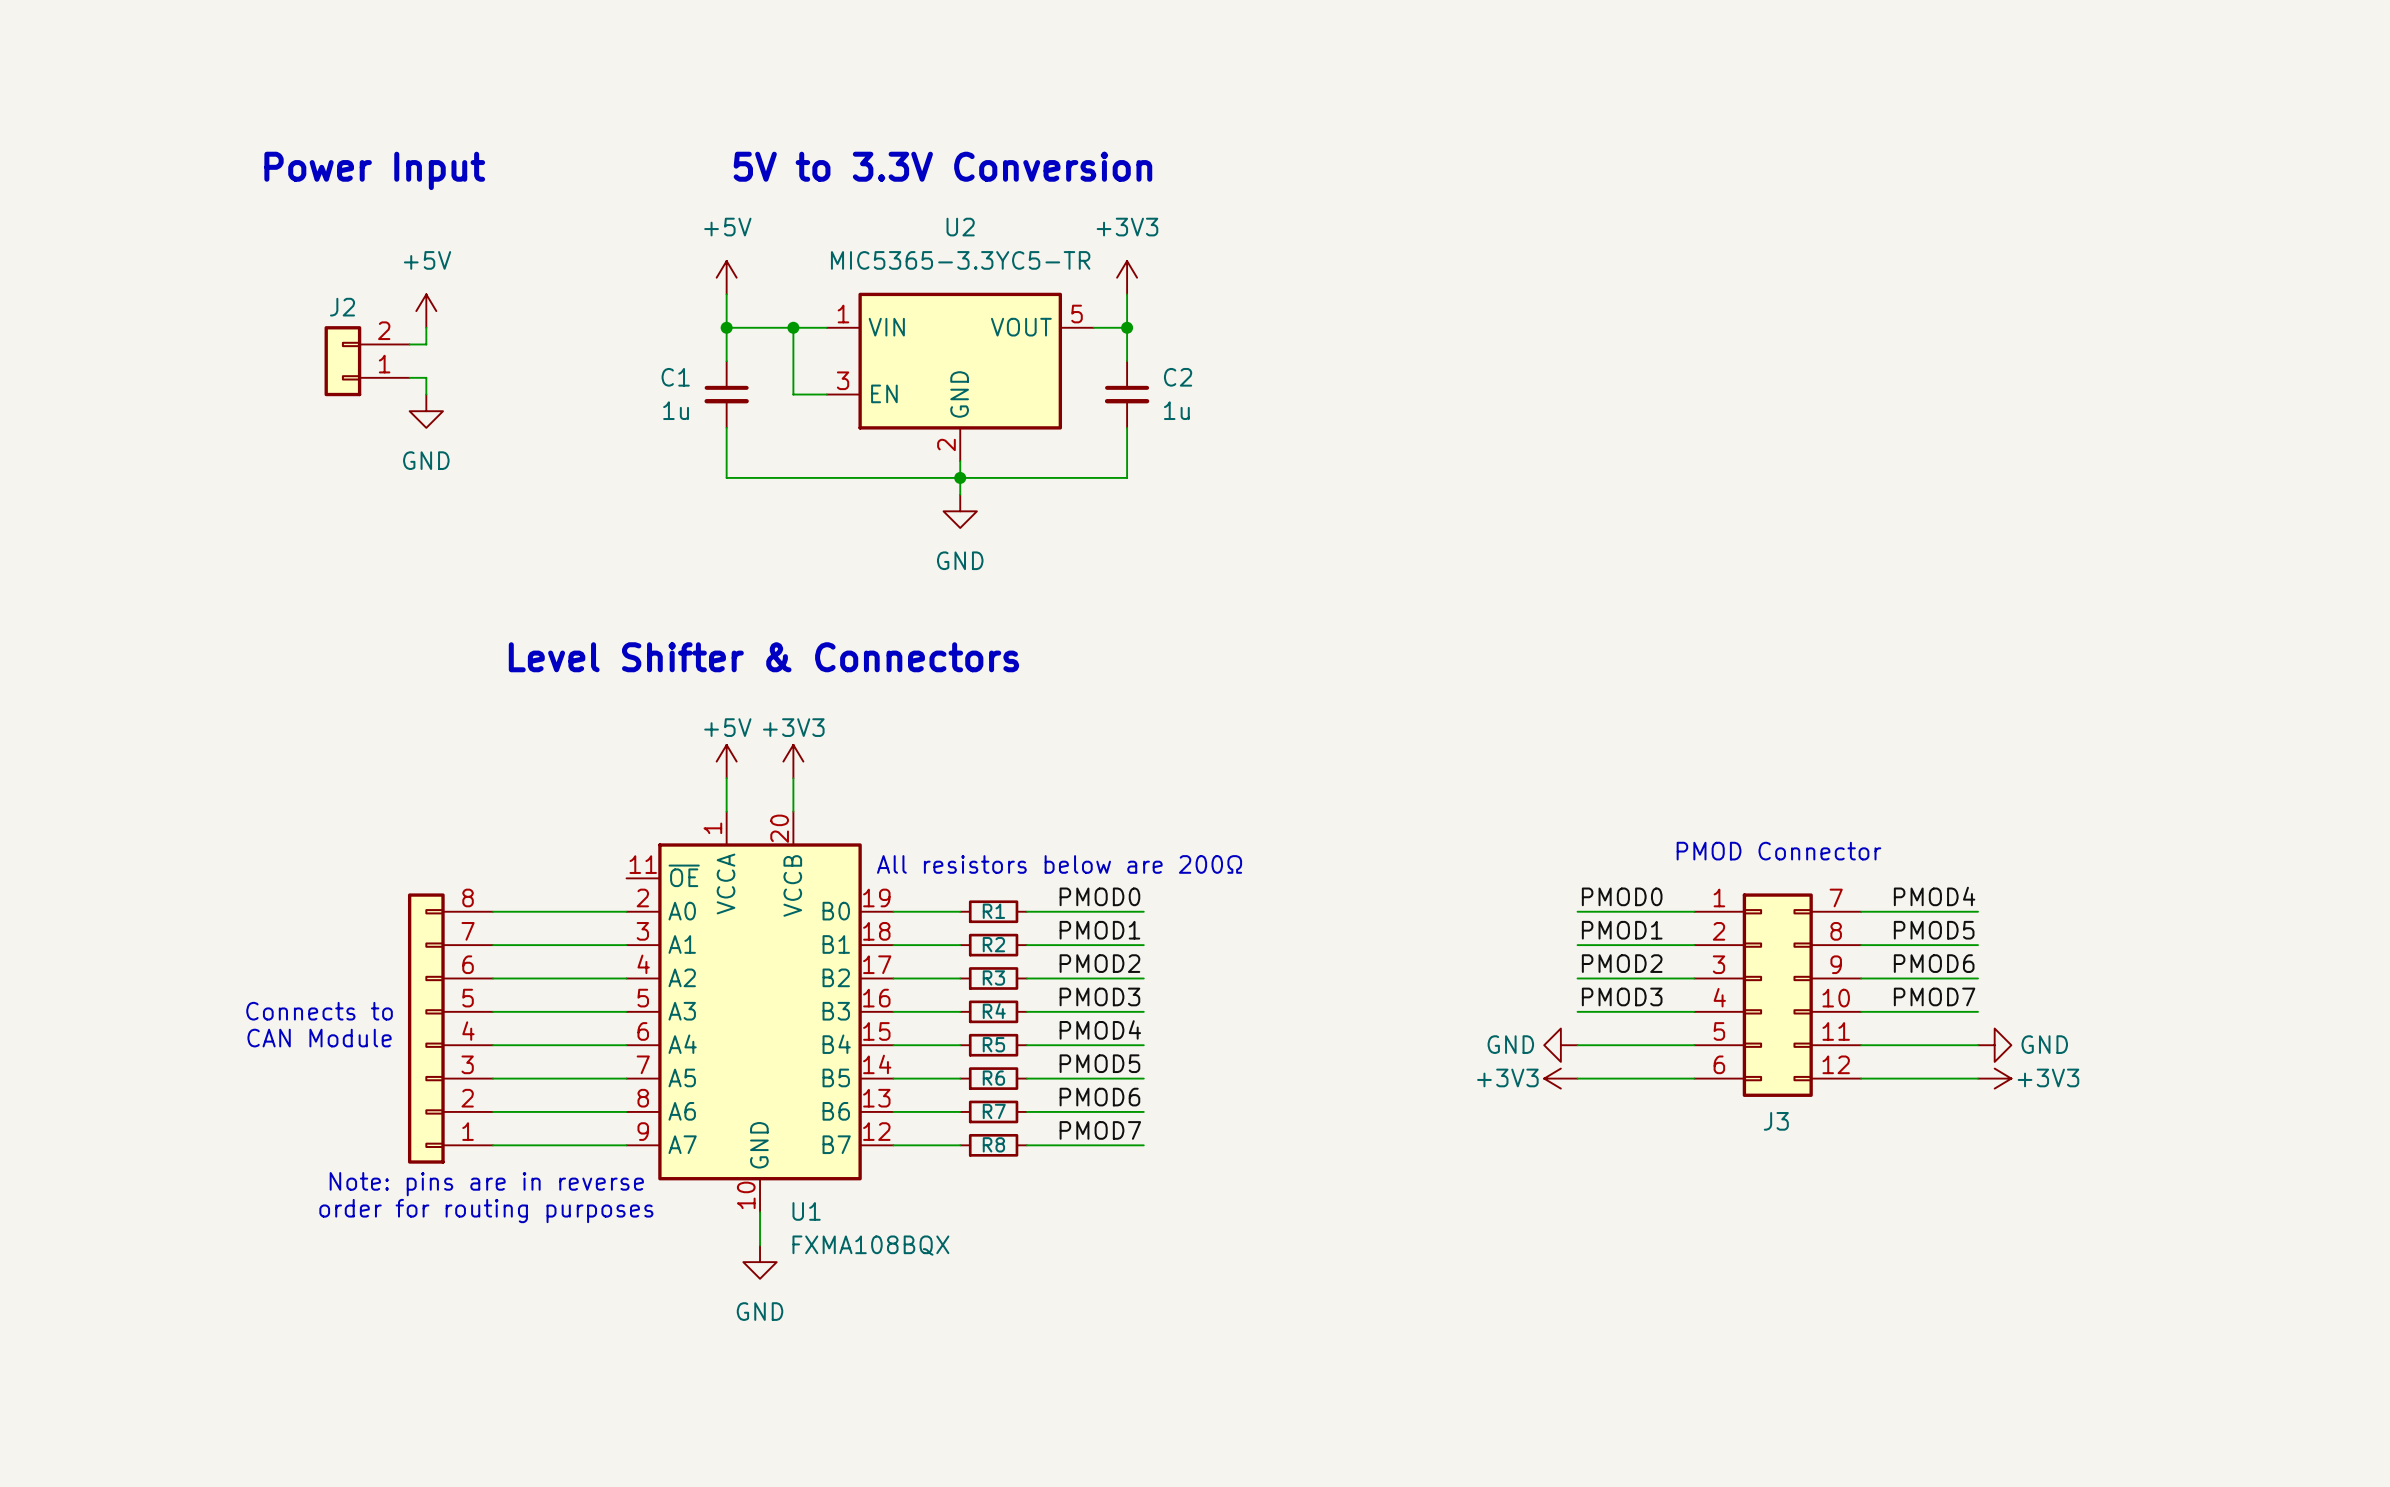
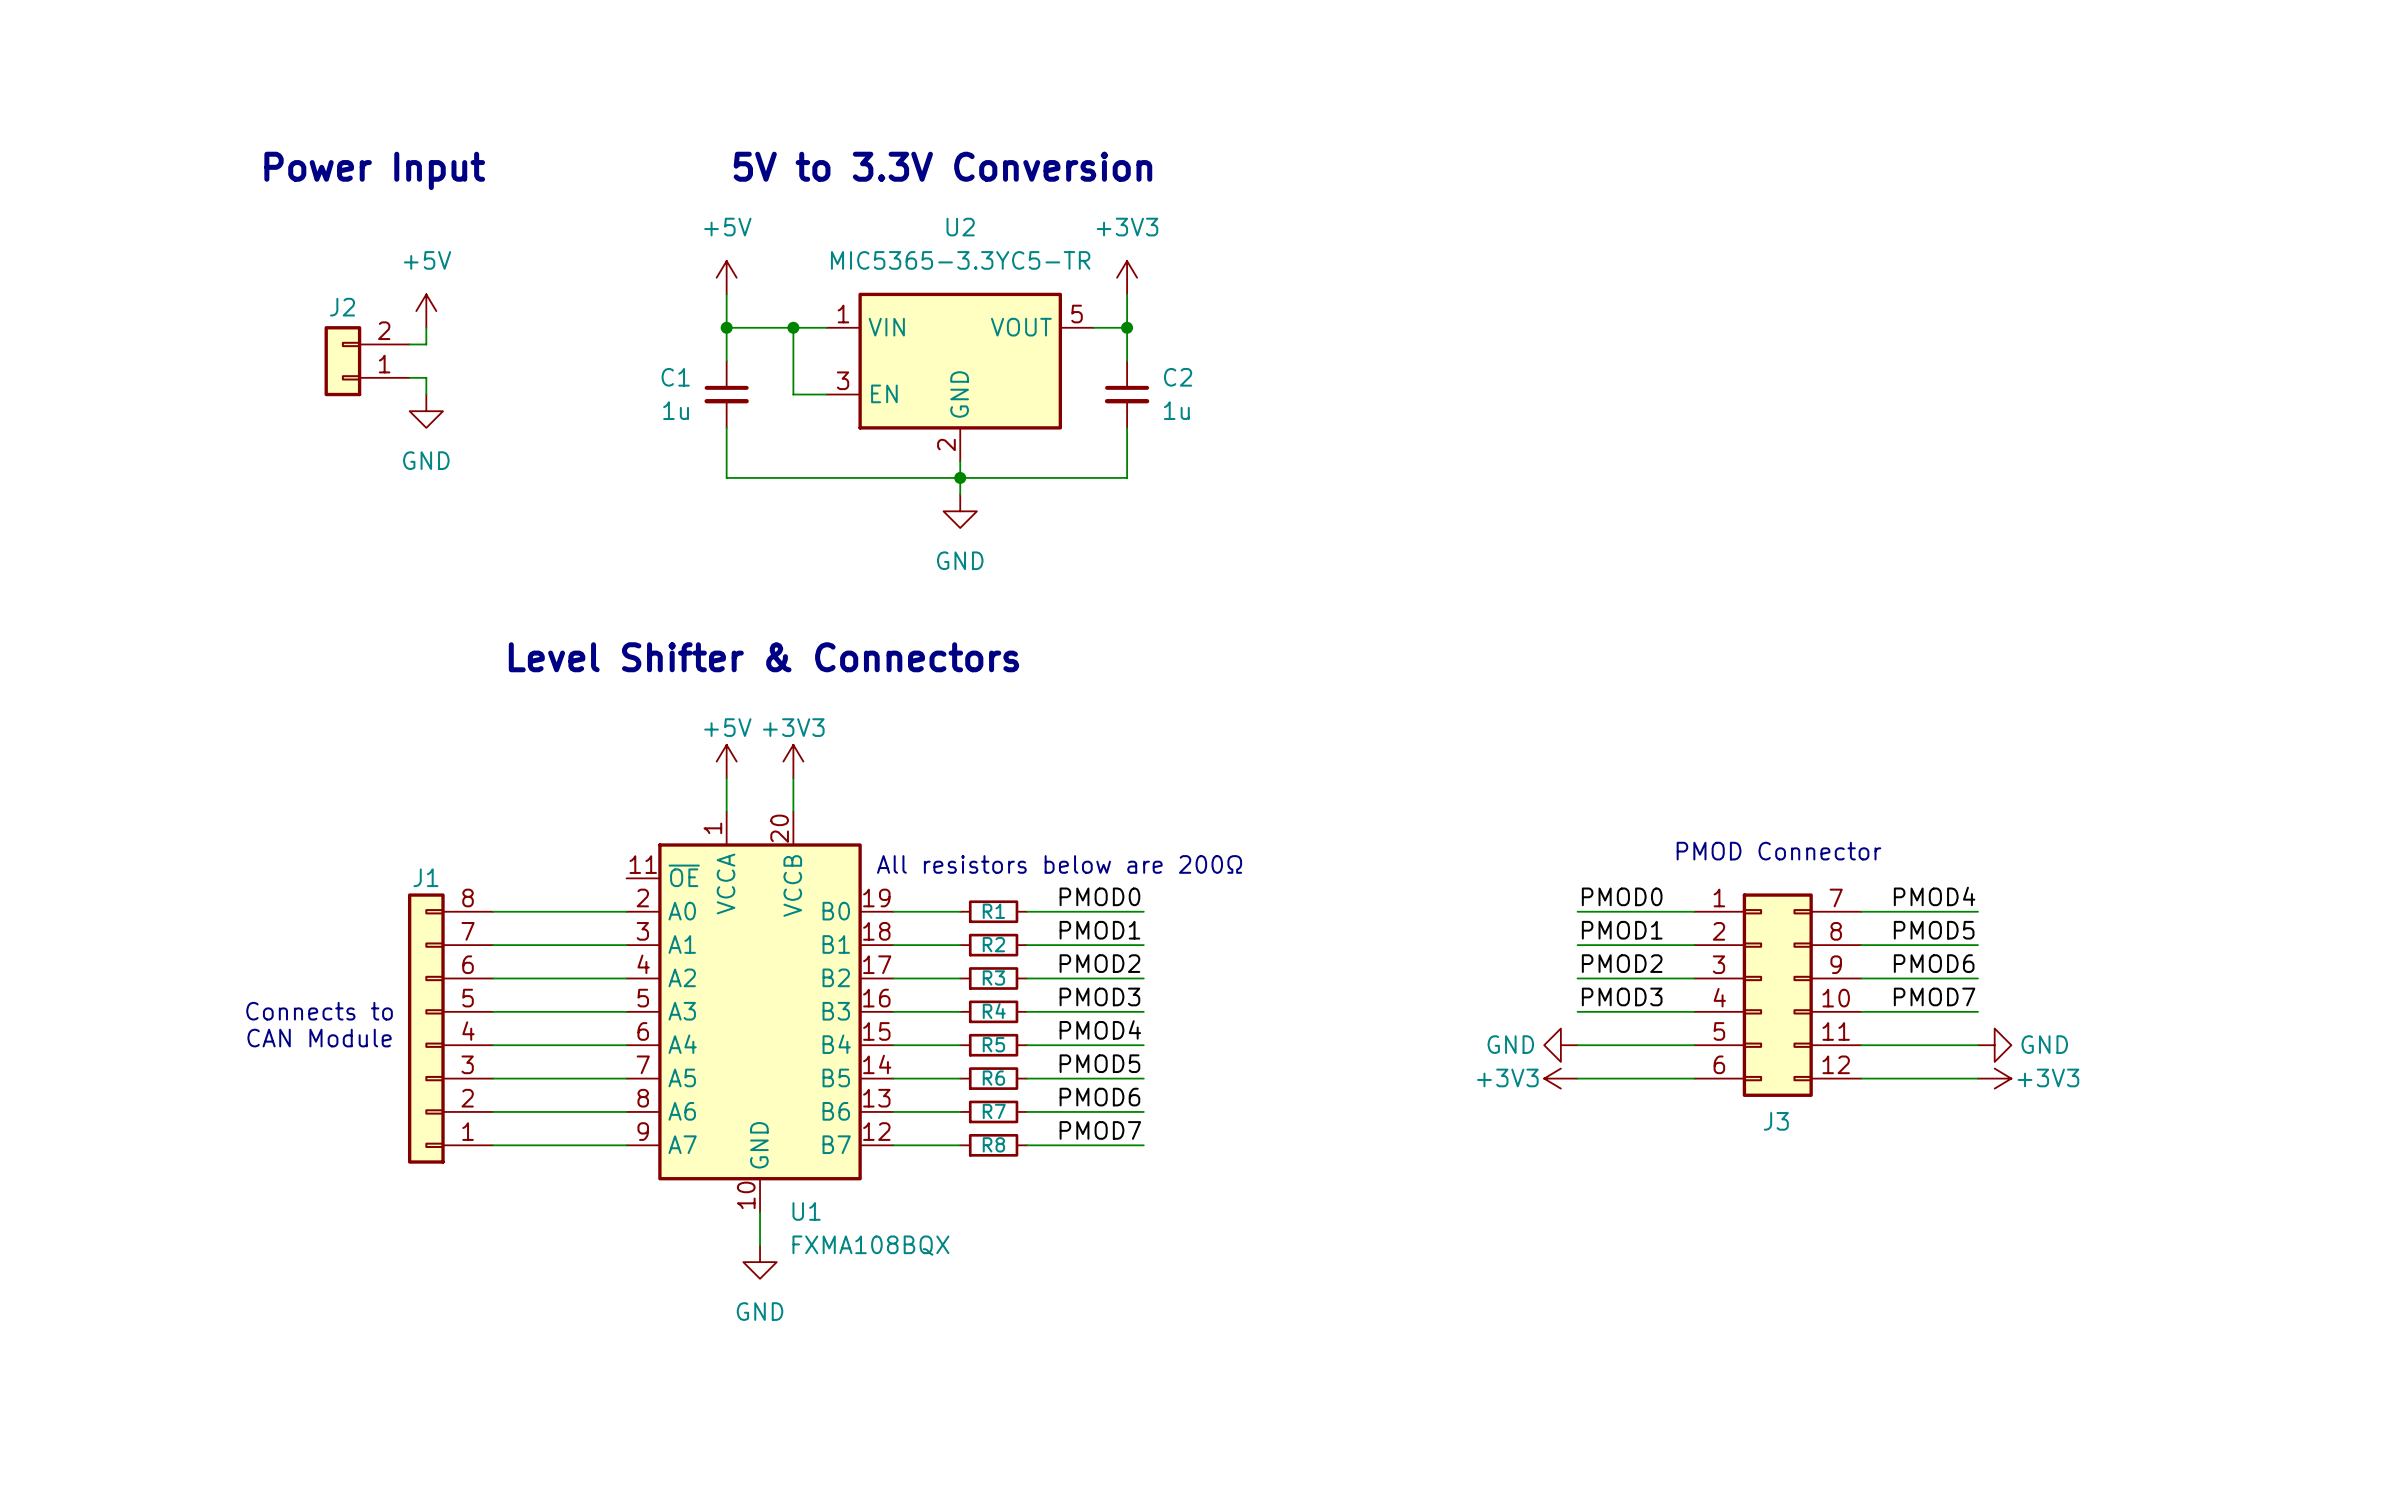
J1 name: none -> J1 (425, 877)
text: Note: pins are in reverse (486, 1184) -> none
text: order for routing purposes (486, 1211) -> none

